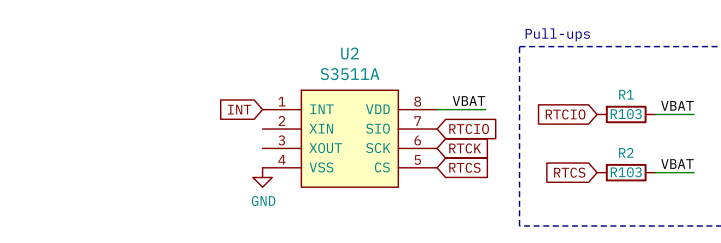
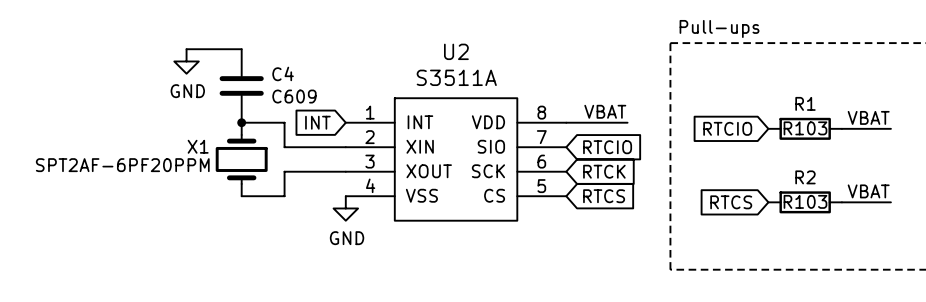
wire: none -> (186, 49) (241, 49)
power symbol: none -> GND (186, 61)
C4: none -> C609 (241, 85)
wire: none -> (241, 122) (284, 122) (284, 147) (345, 147)
junction: none -> (241, 122)
X1: none -> SPT2AF-6PF20PPM (241, 159)
wire: none -> (345, 171) (284, 171) (284, 196) (241, 196)

